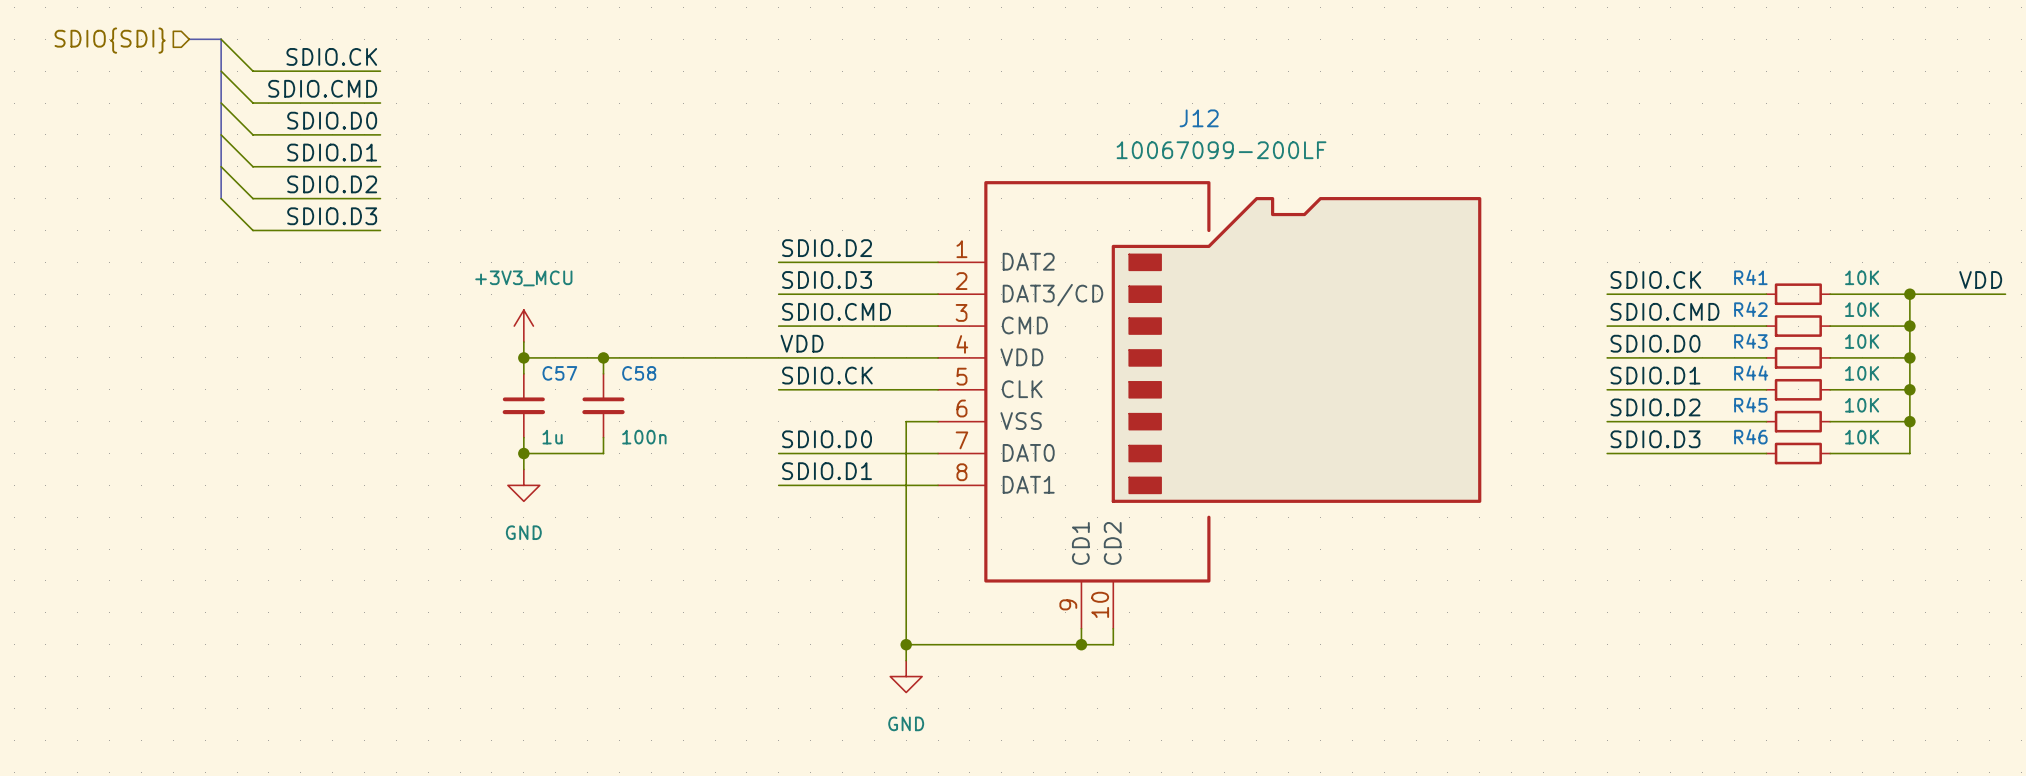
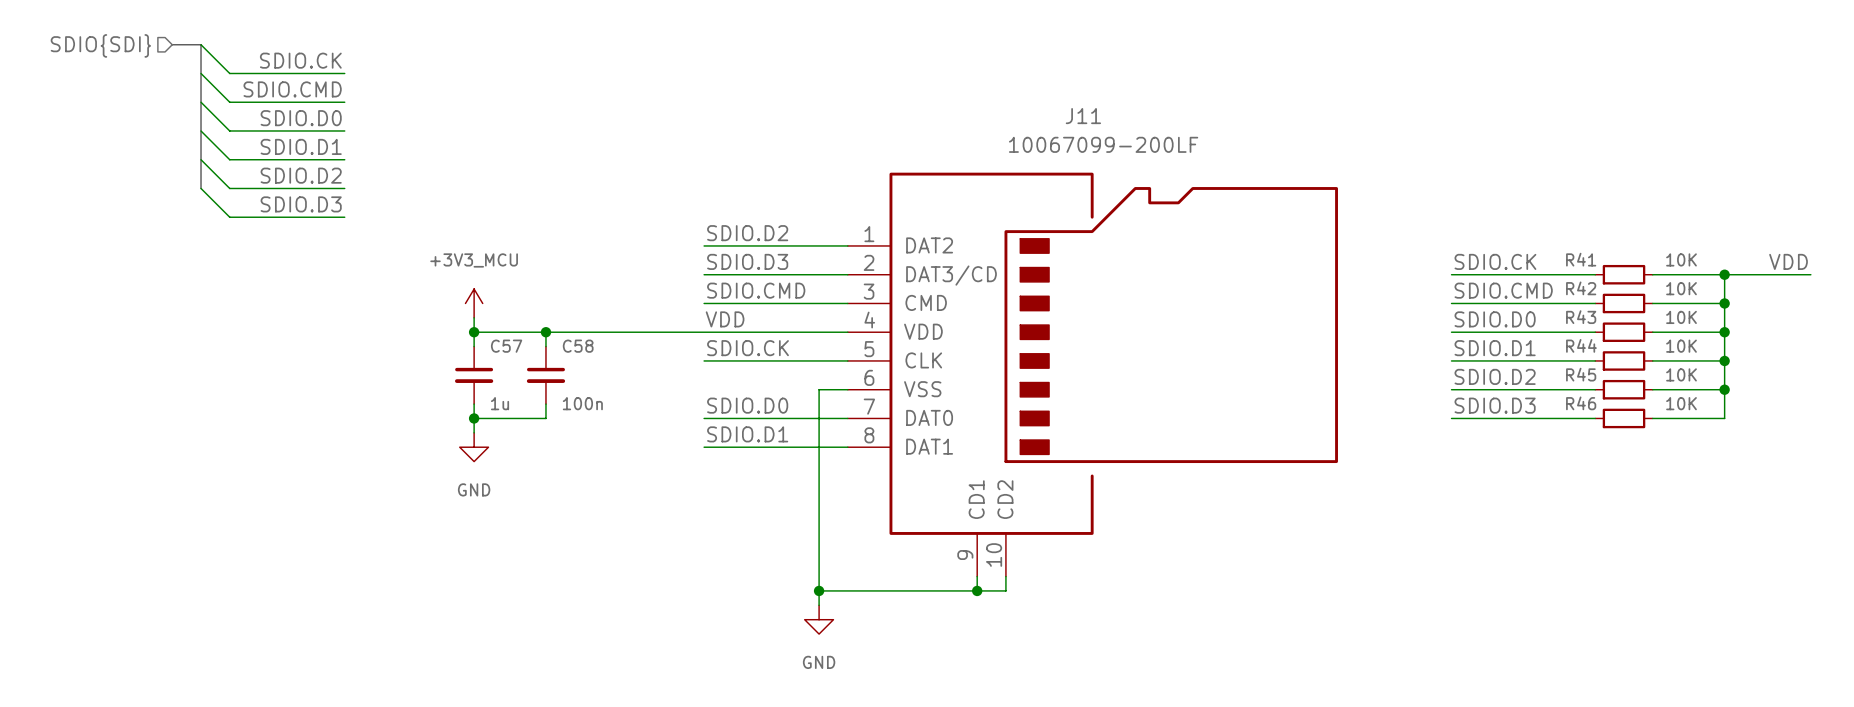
J12 name: J12 (1199, 118) -> J11 (1083, 116)

